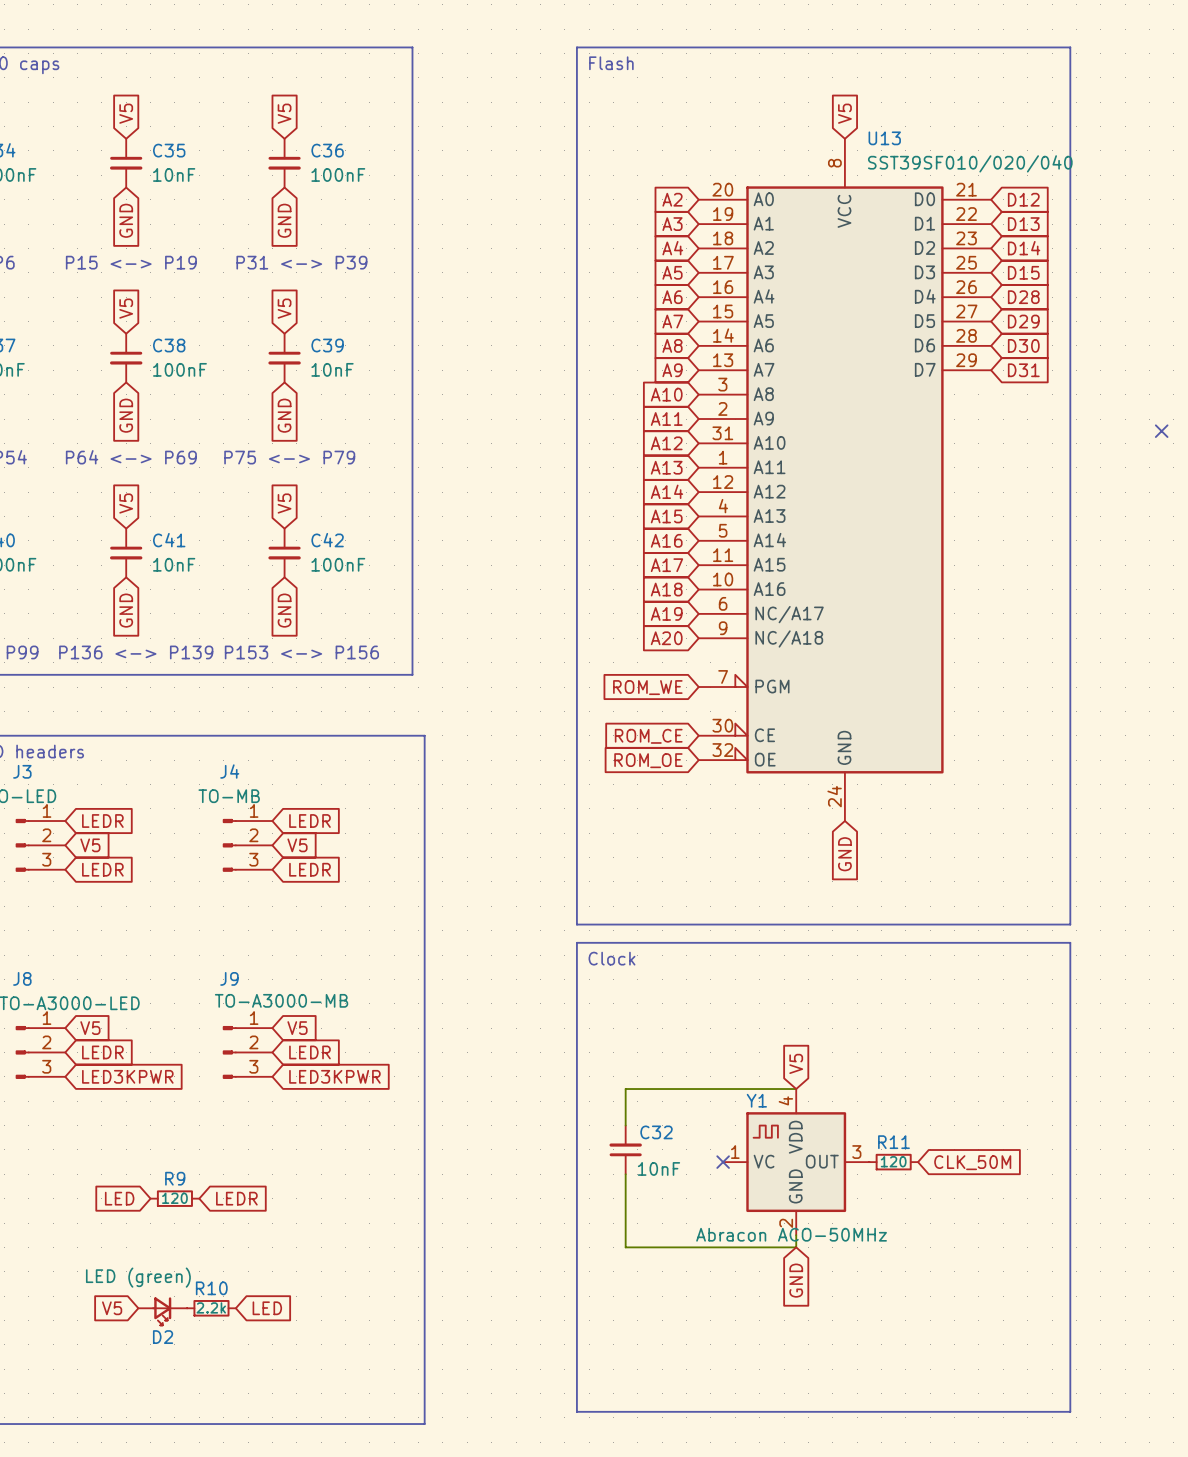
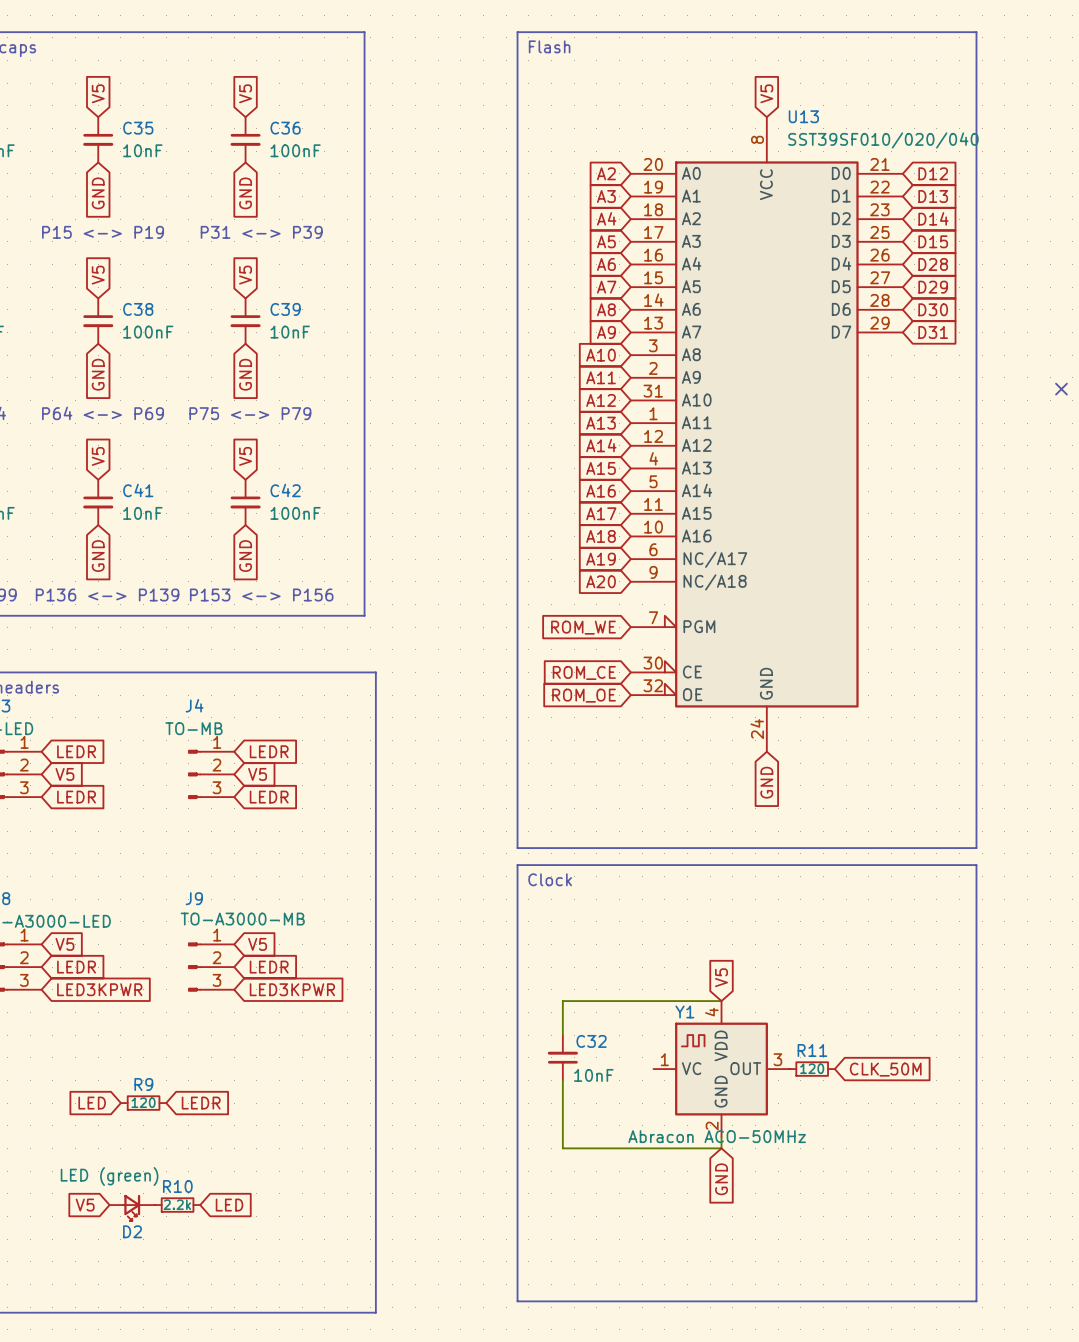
no-connect mark: (723, 1162) -> none

